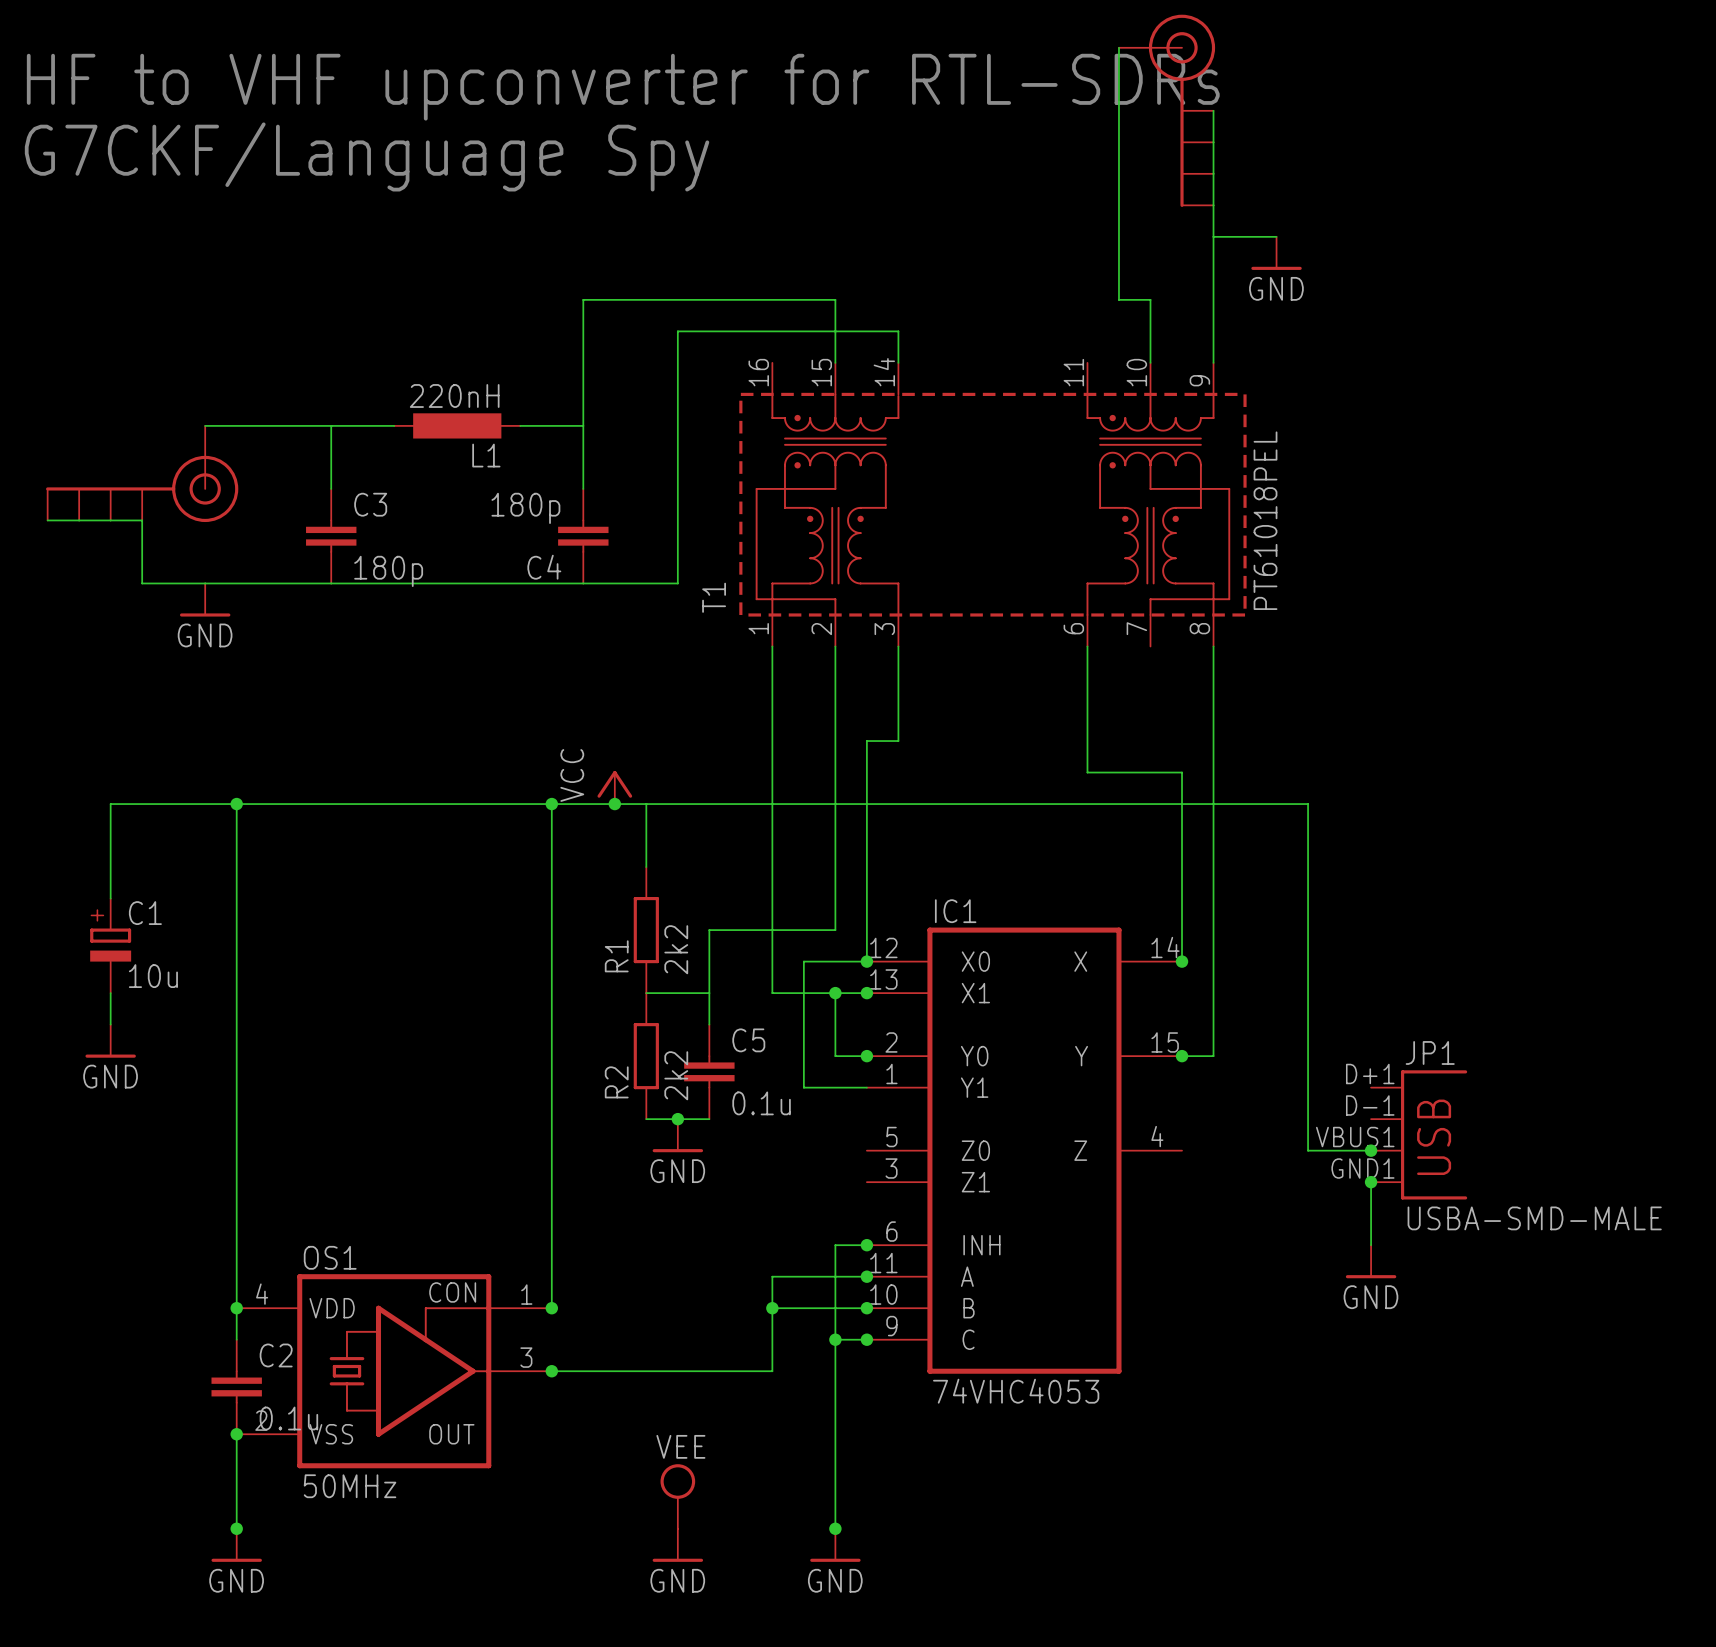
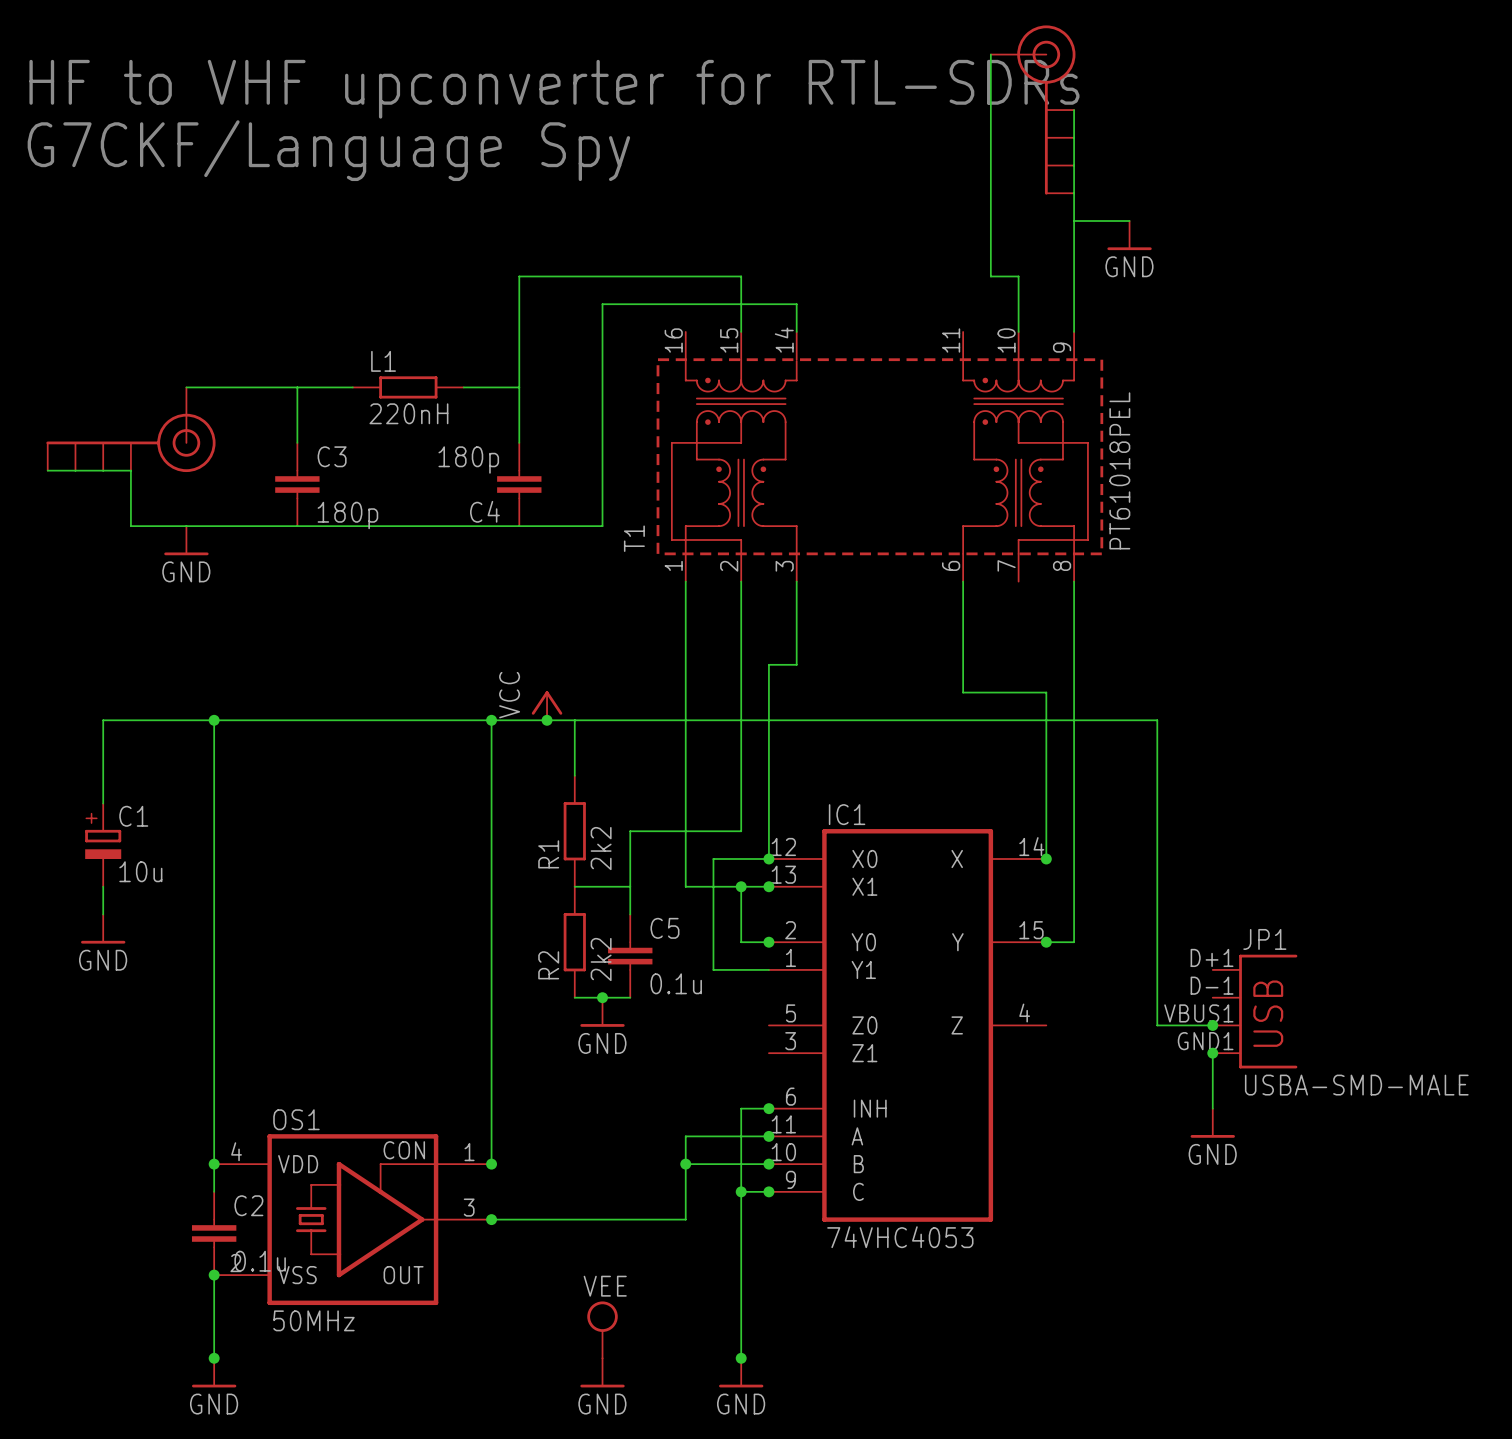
L1 value position: 220nH (454, 395) -> 220nH (408, 413)
L1 symbol: [394, 413, 521, 439] -> [352, 376, 464, 399]
L1 name position: L1 (486, 455) -> L1 (383, 361)

